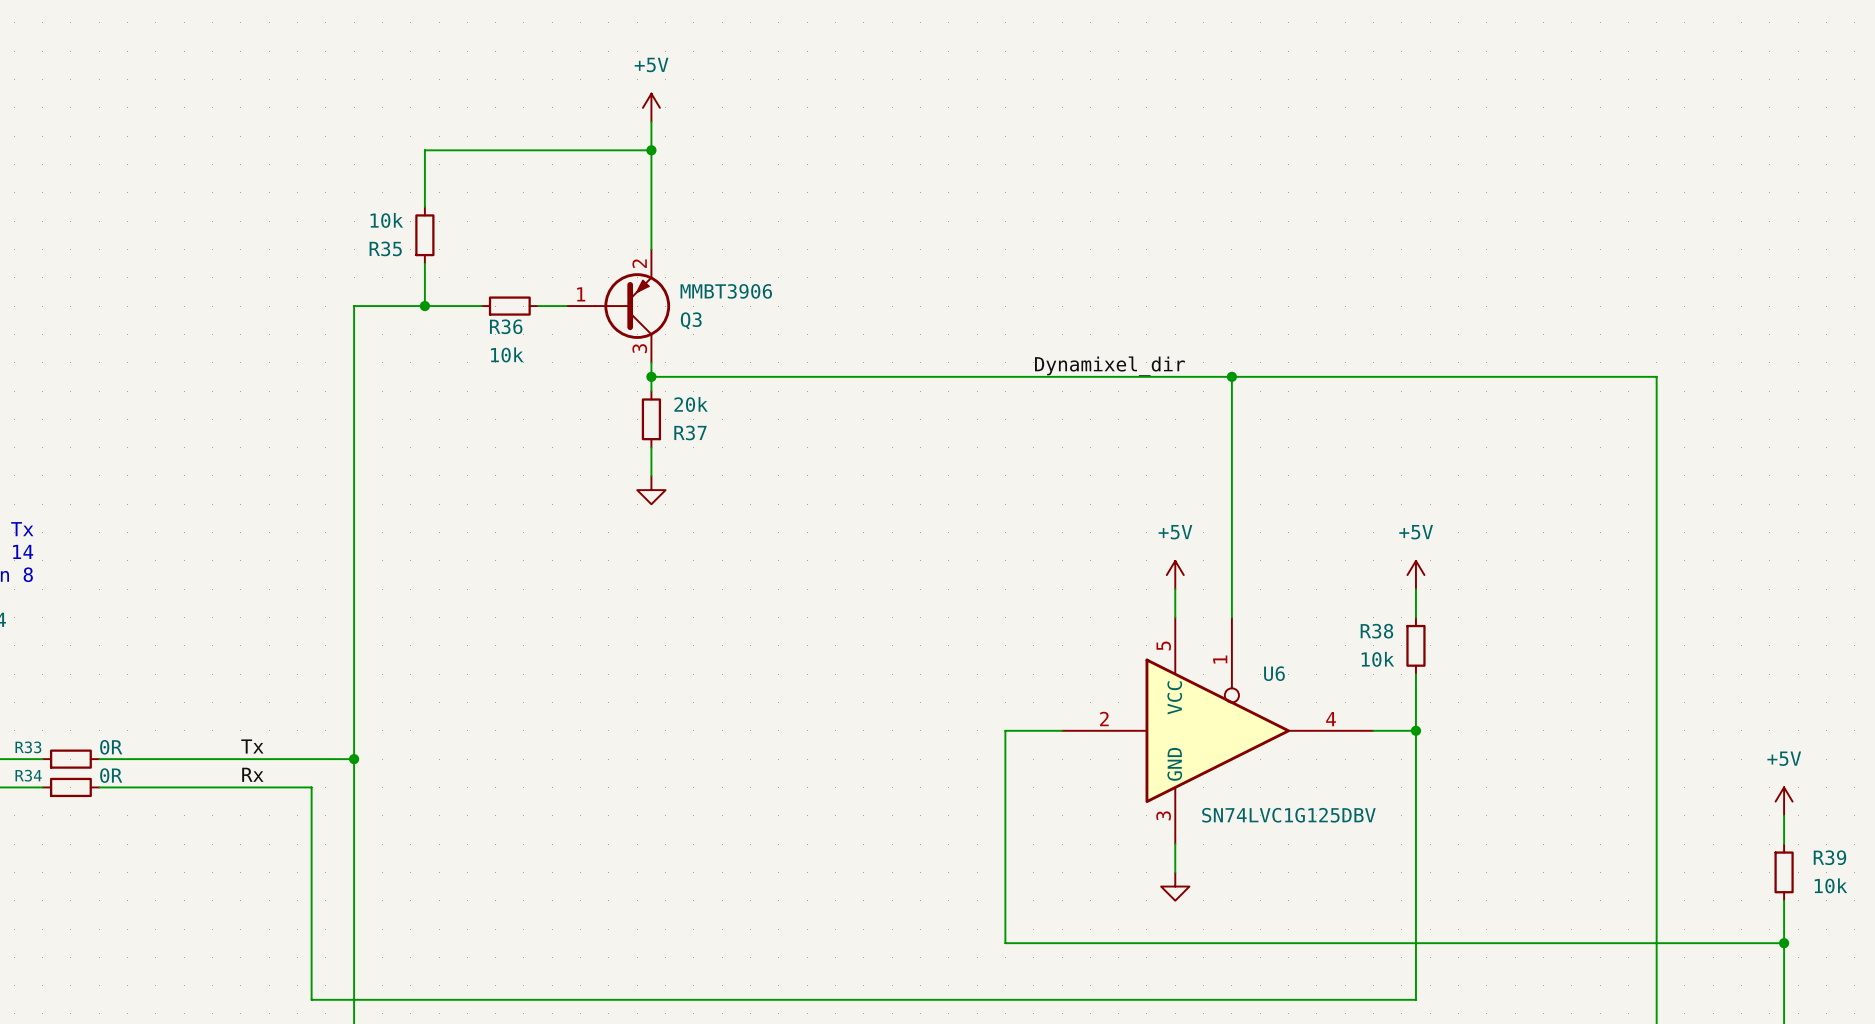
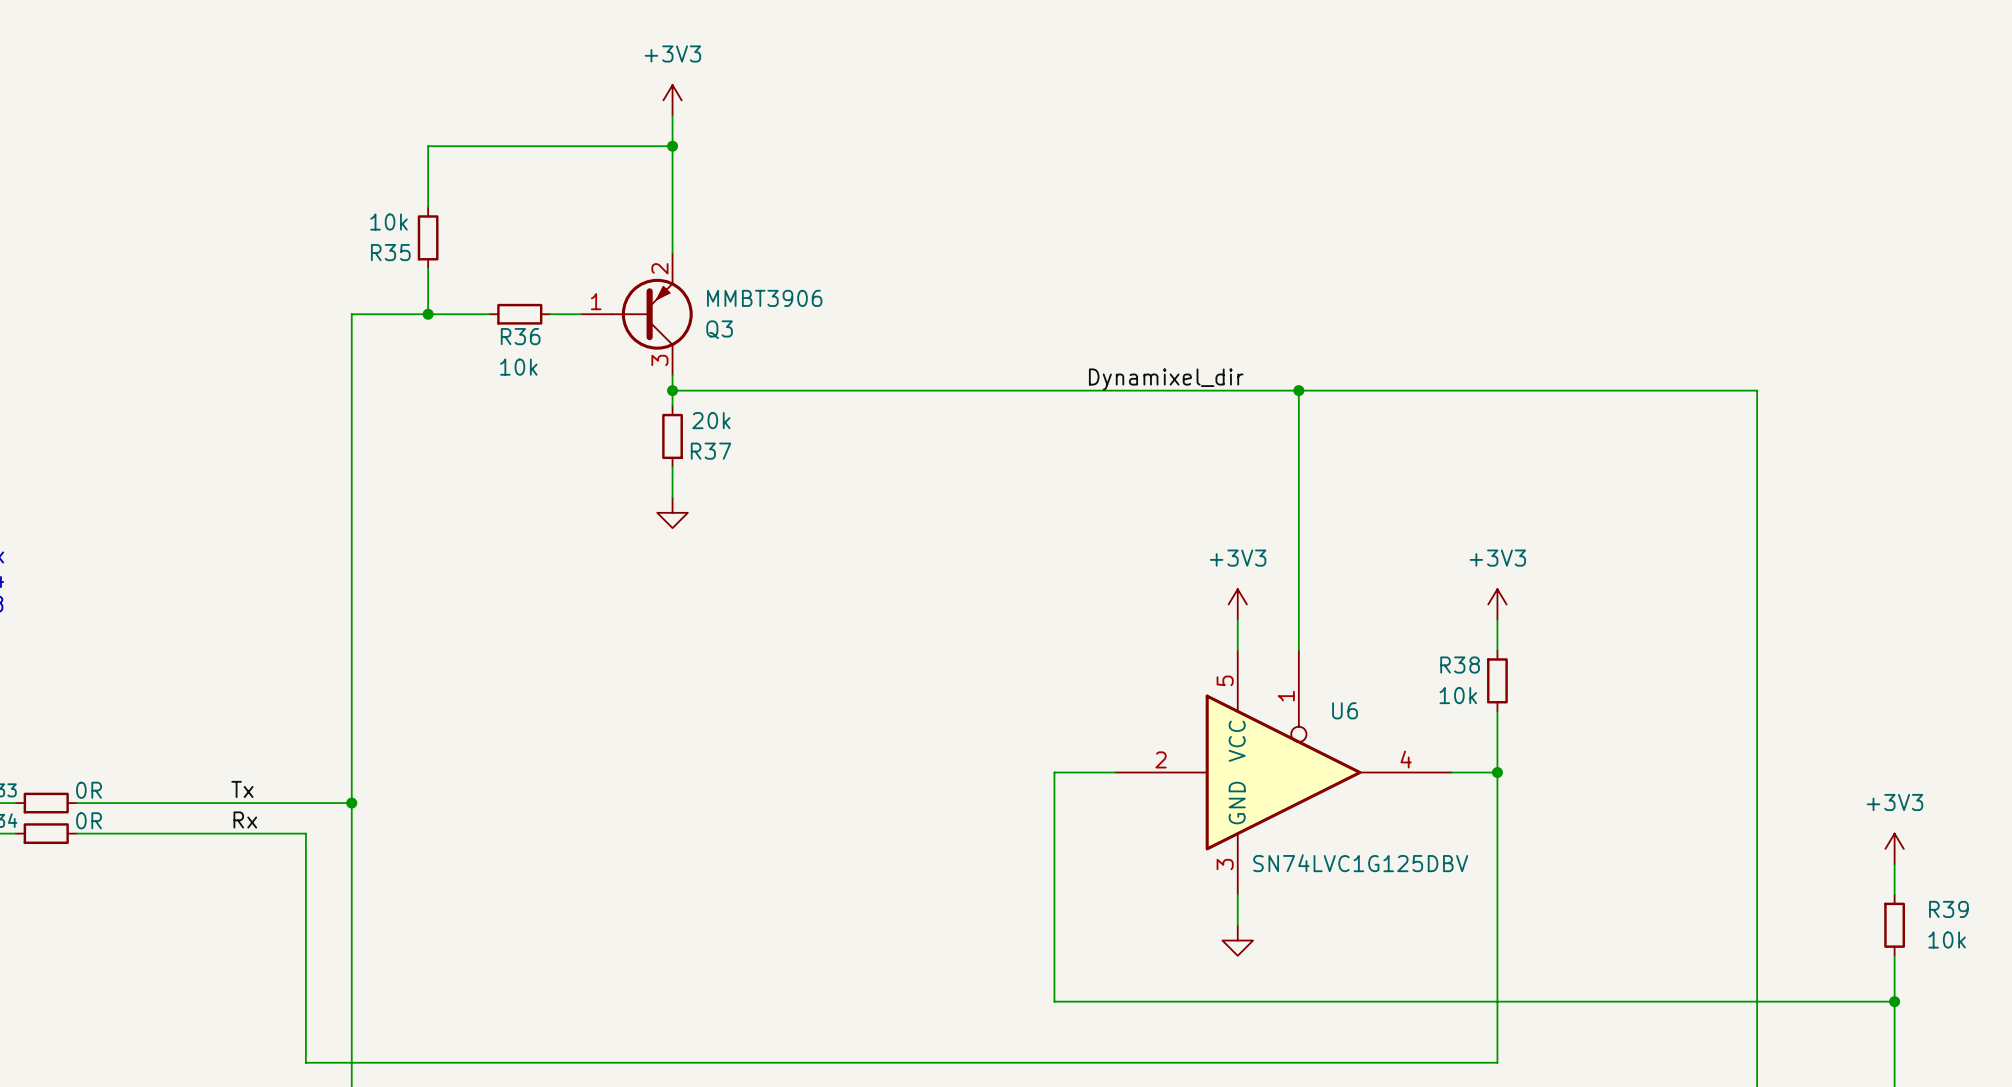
power symbol: +5V (651, 107) -> +3V3 (672, 100)
power symbol: +5V (1175, 575) -> +3V3 (1237, 604)
power symbol: +5V (1415, 575) -> +3V3 (1497, 604)
power symbol: +5V (1784, 801) -> +3V3 (1894, 848)

